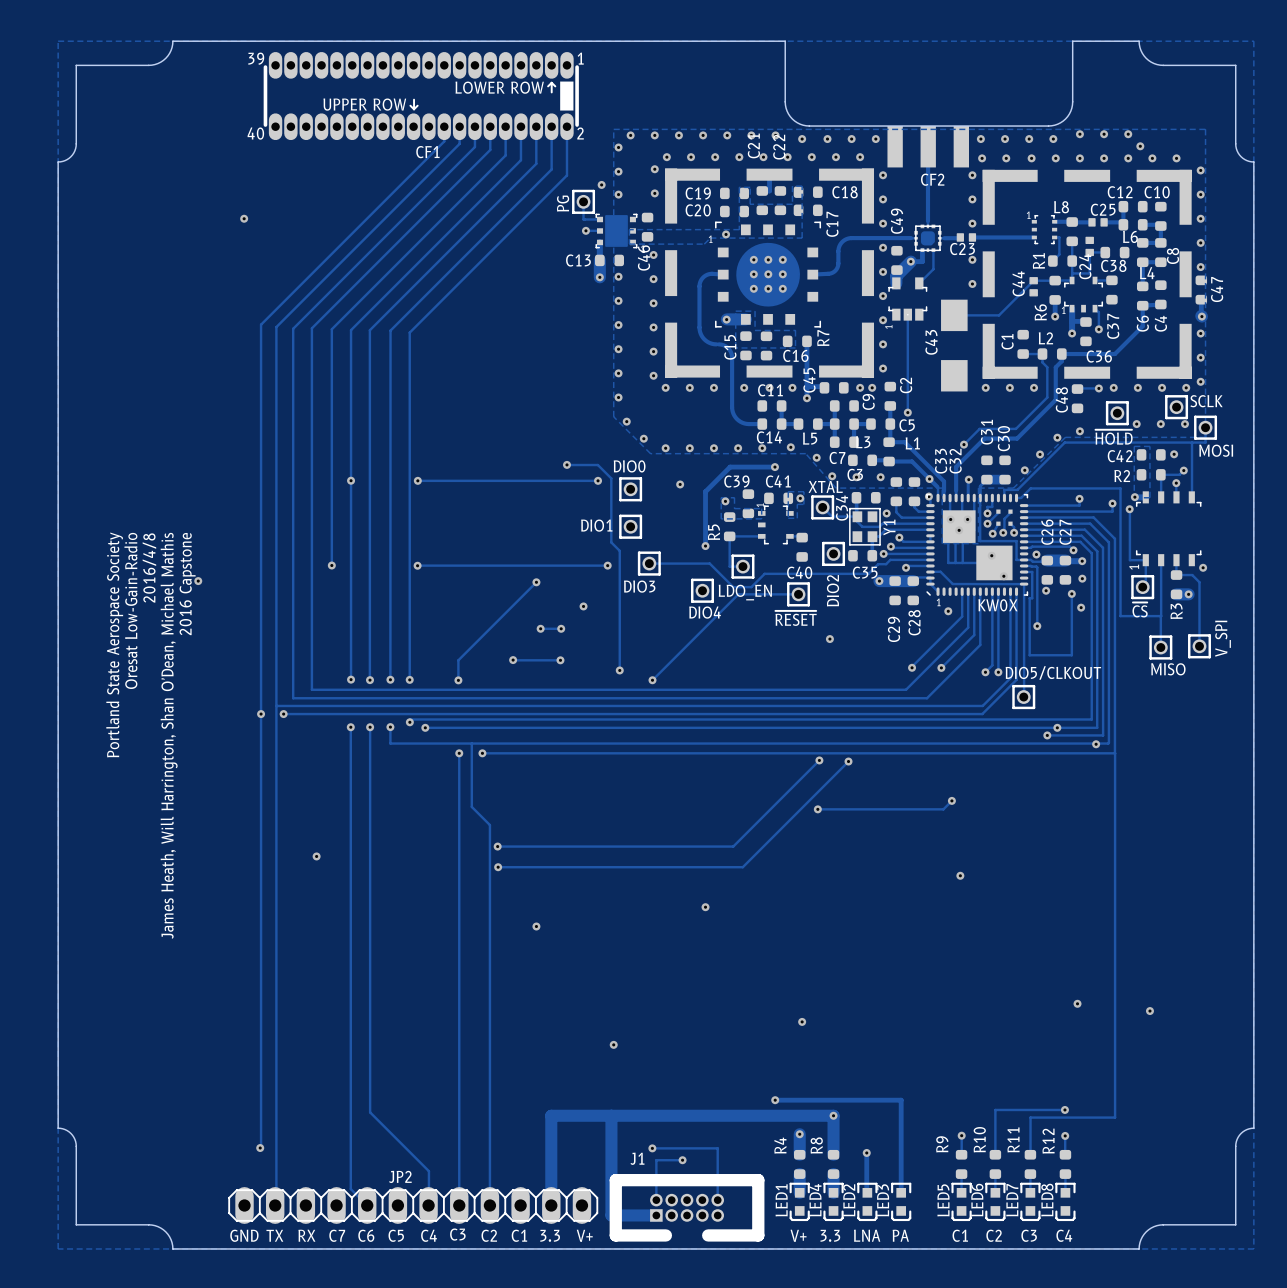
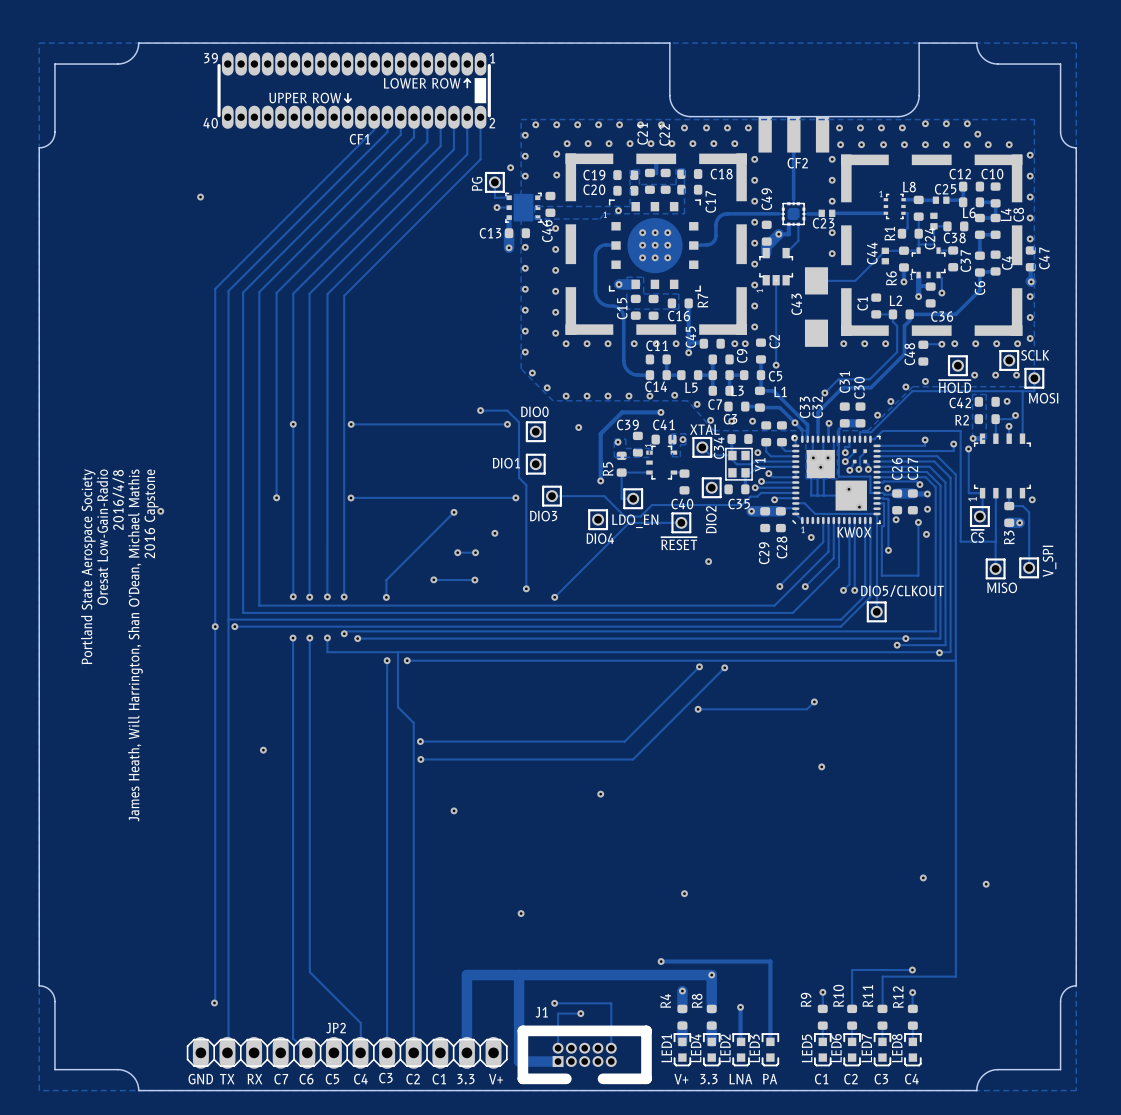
C8 name position: C8 (1173, 255) -> C8 (1018, 214)
L4 name rotation: 0° (1147, 273) -> 90° counterclockwise (1006, 214)
L4 name position: L4 (1147, 273) -> L4 (1006, 214)
C4 name position: C4 (1160, 323) -> C4 (1007, 262)
C37 name position: C37 (1113, 326) -> C37 (965, 261)

